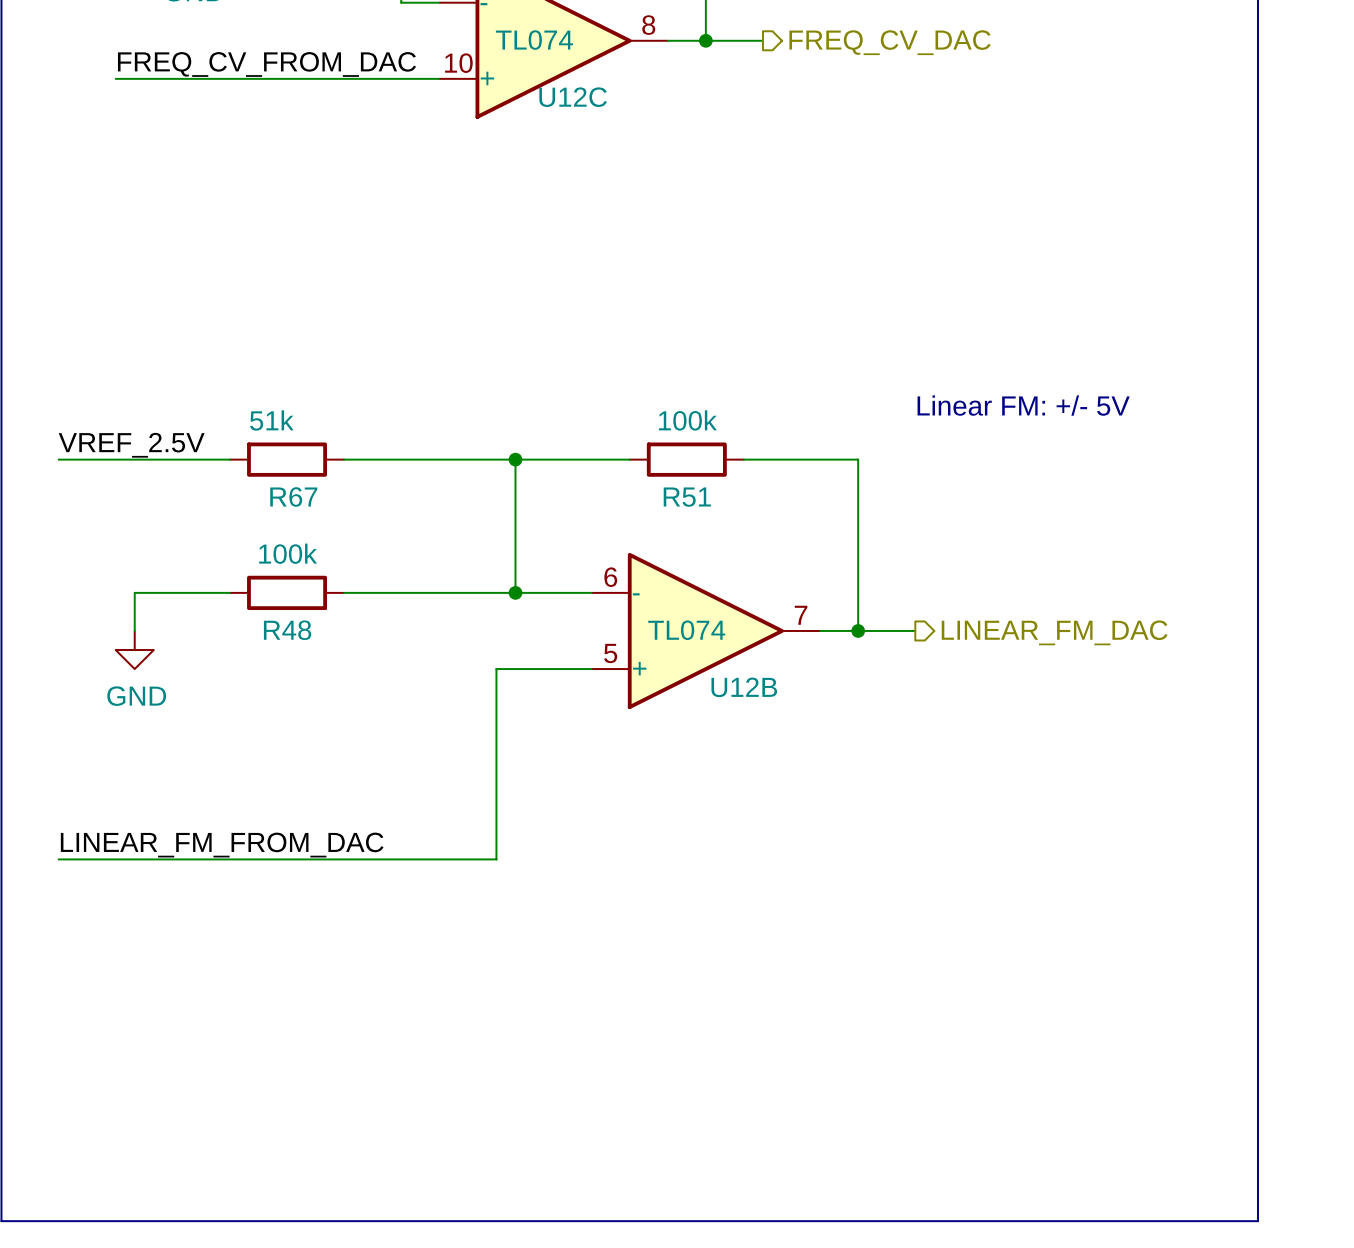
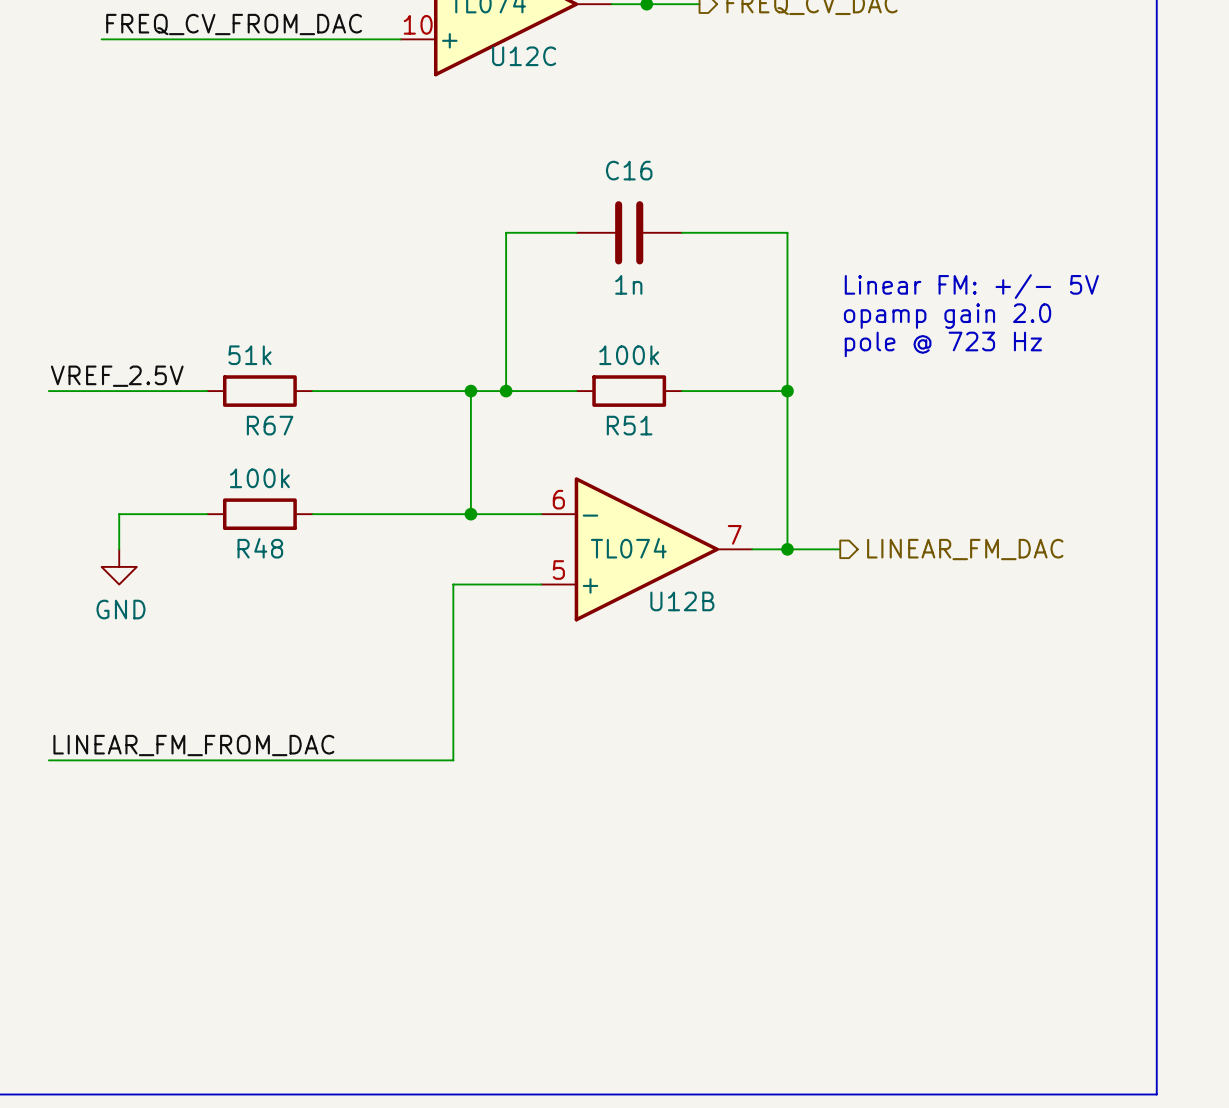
wire: none -> (576, 232) (506, 232) (506, 391)
C16: none -> 1n (629, 232)
wire: none -> (681, 232) (787, 232) (787, 391)
text: none -> Linear FM: +/- 5V (971, 286)
text: none -> opamp gain 2.0 (947, 316)
text: Linear FM: +/- 5V (1023, 405) -> pole @ 723 Hz (943, 344)
junction: none -> (506, 391)
junction: none -> (787, 391)

